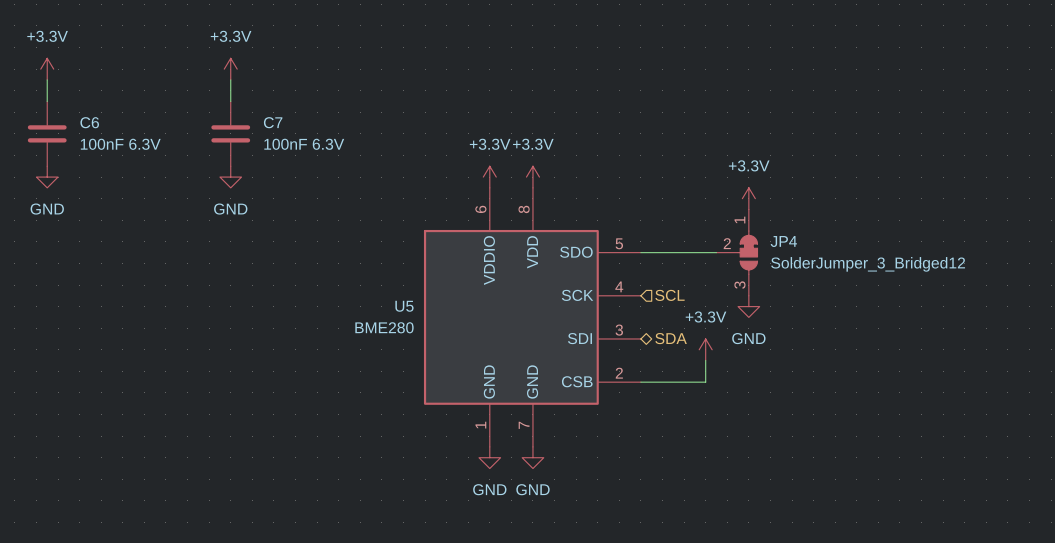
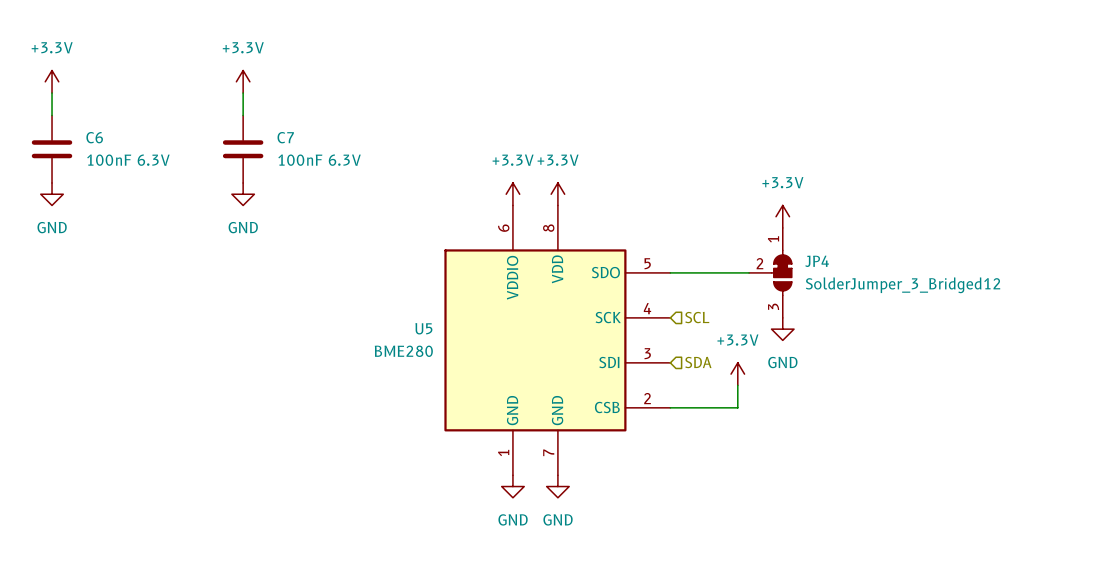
hierarchical label shape: bidirectional (671, 338) -> input (698, 362)

